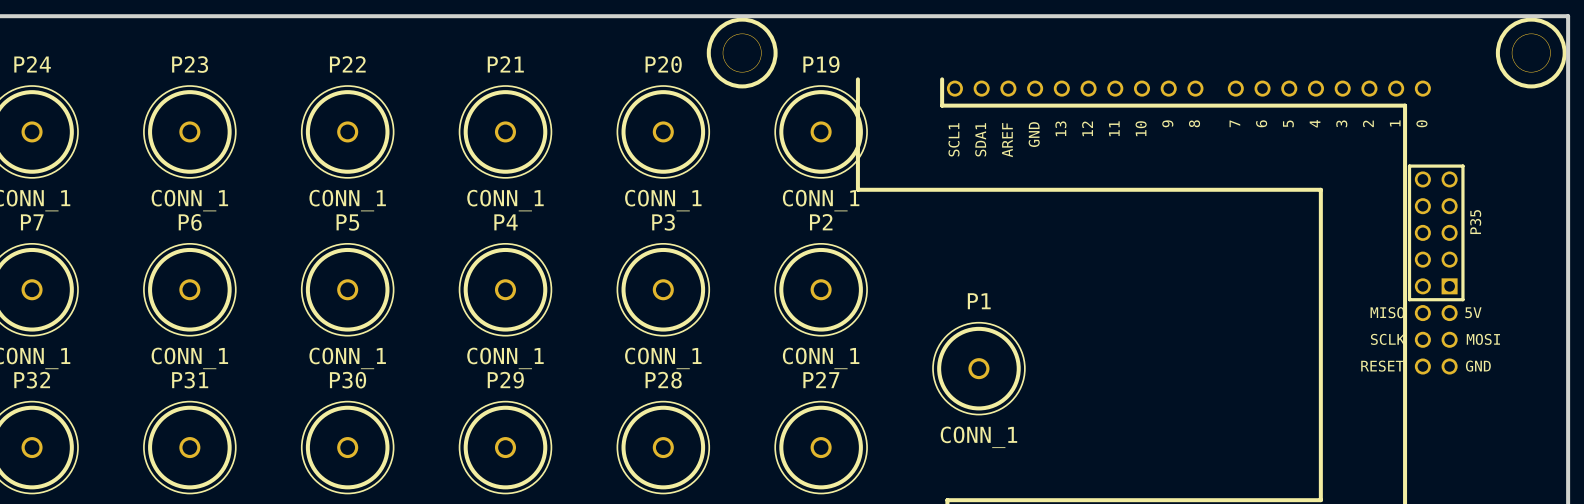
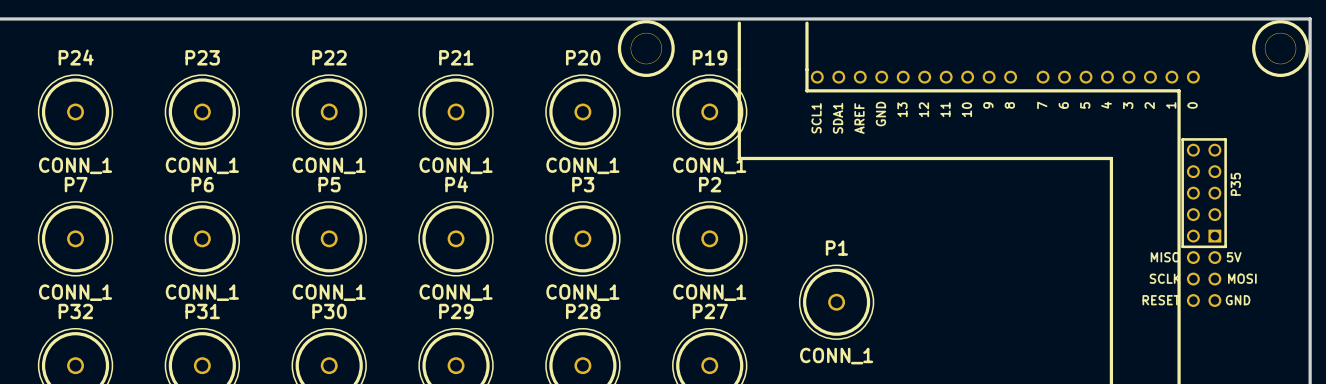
line: none -> (739, 23) (739, 69)
line: none -> (806, 23) (806, 69)

